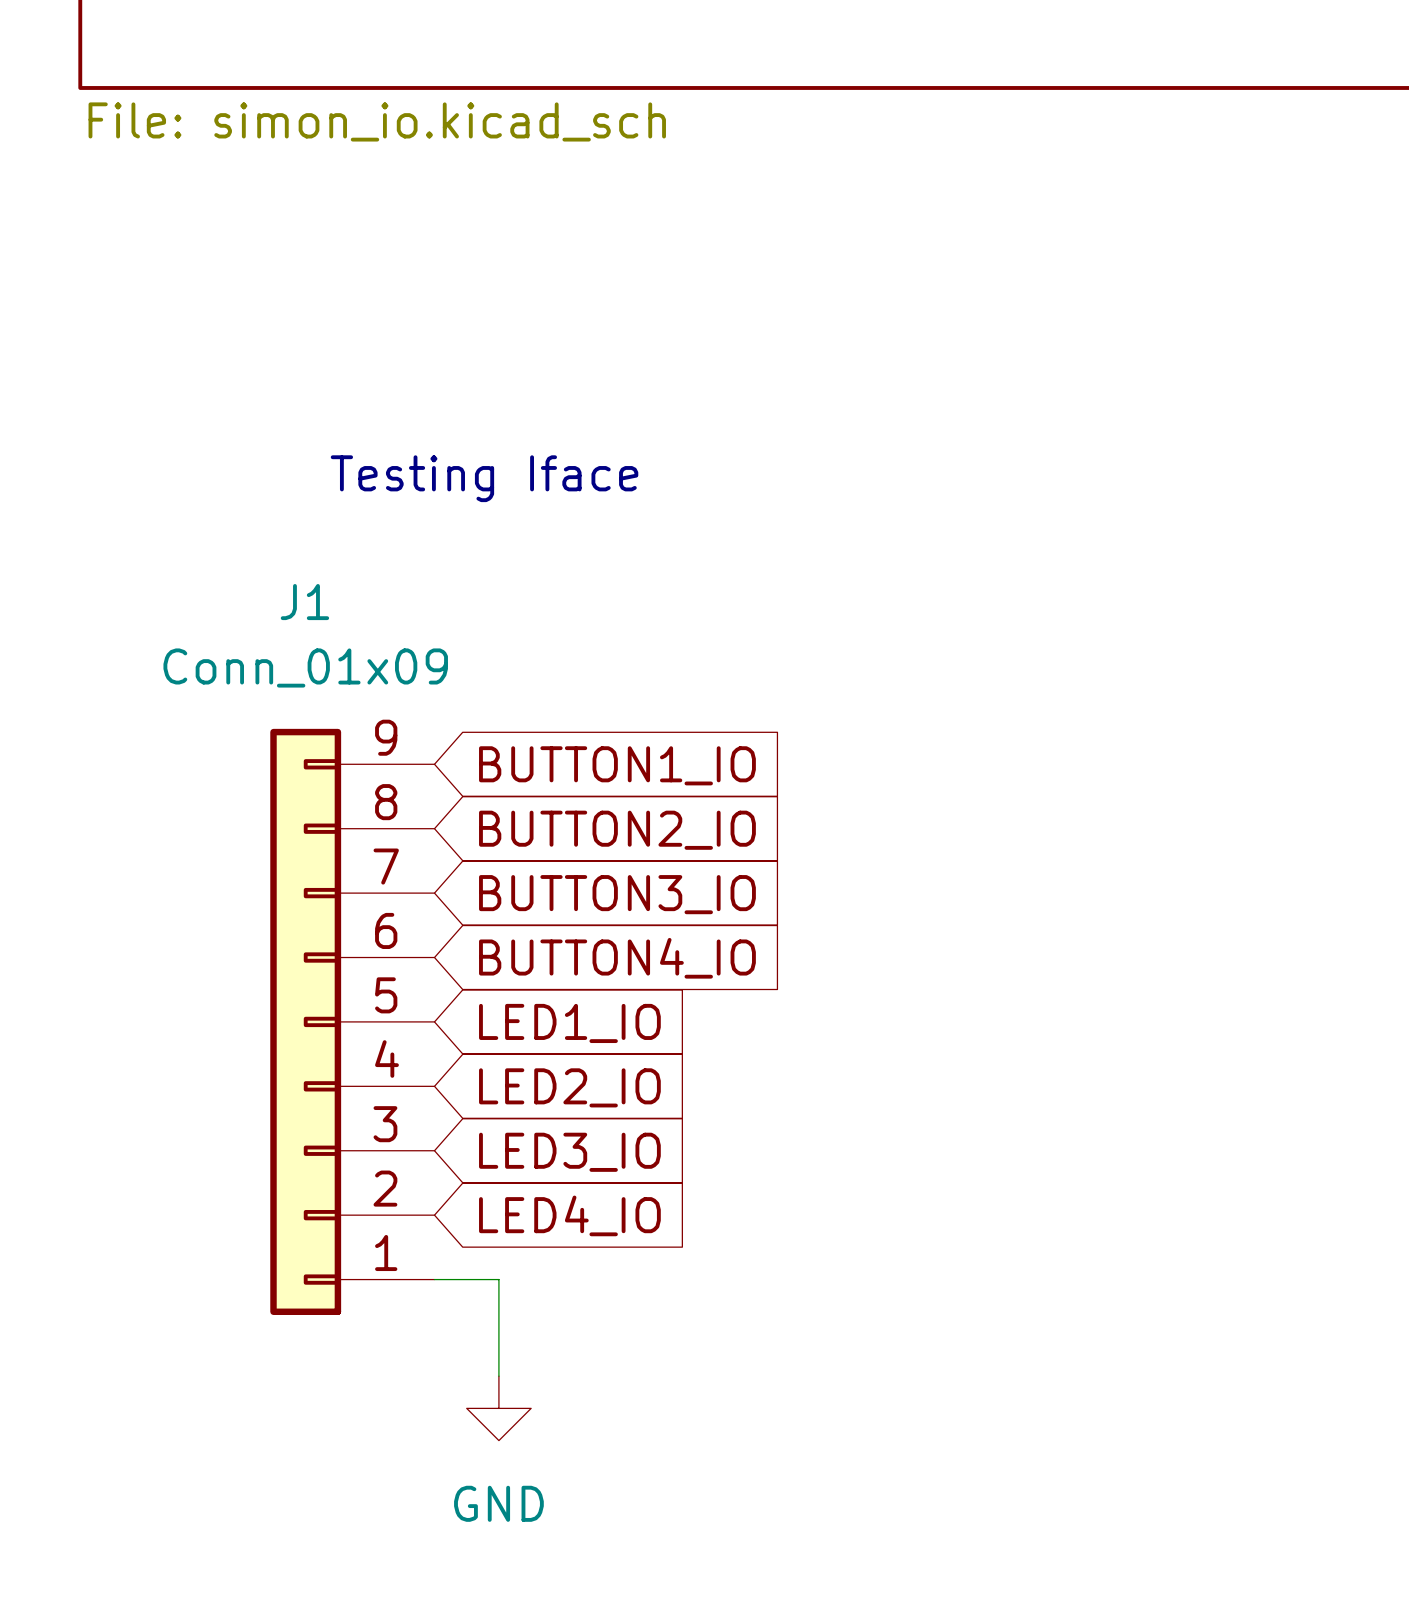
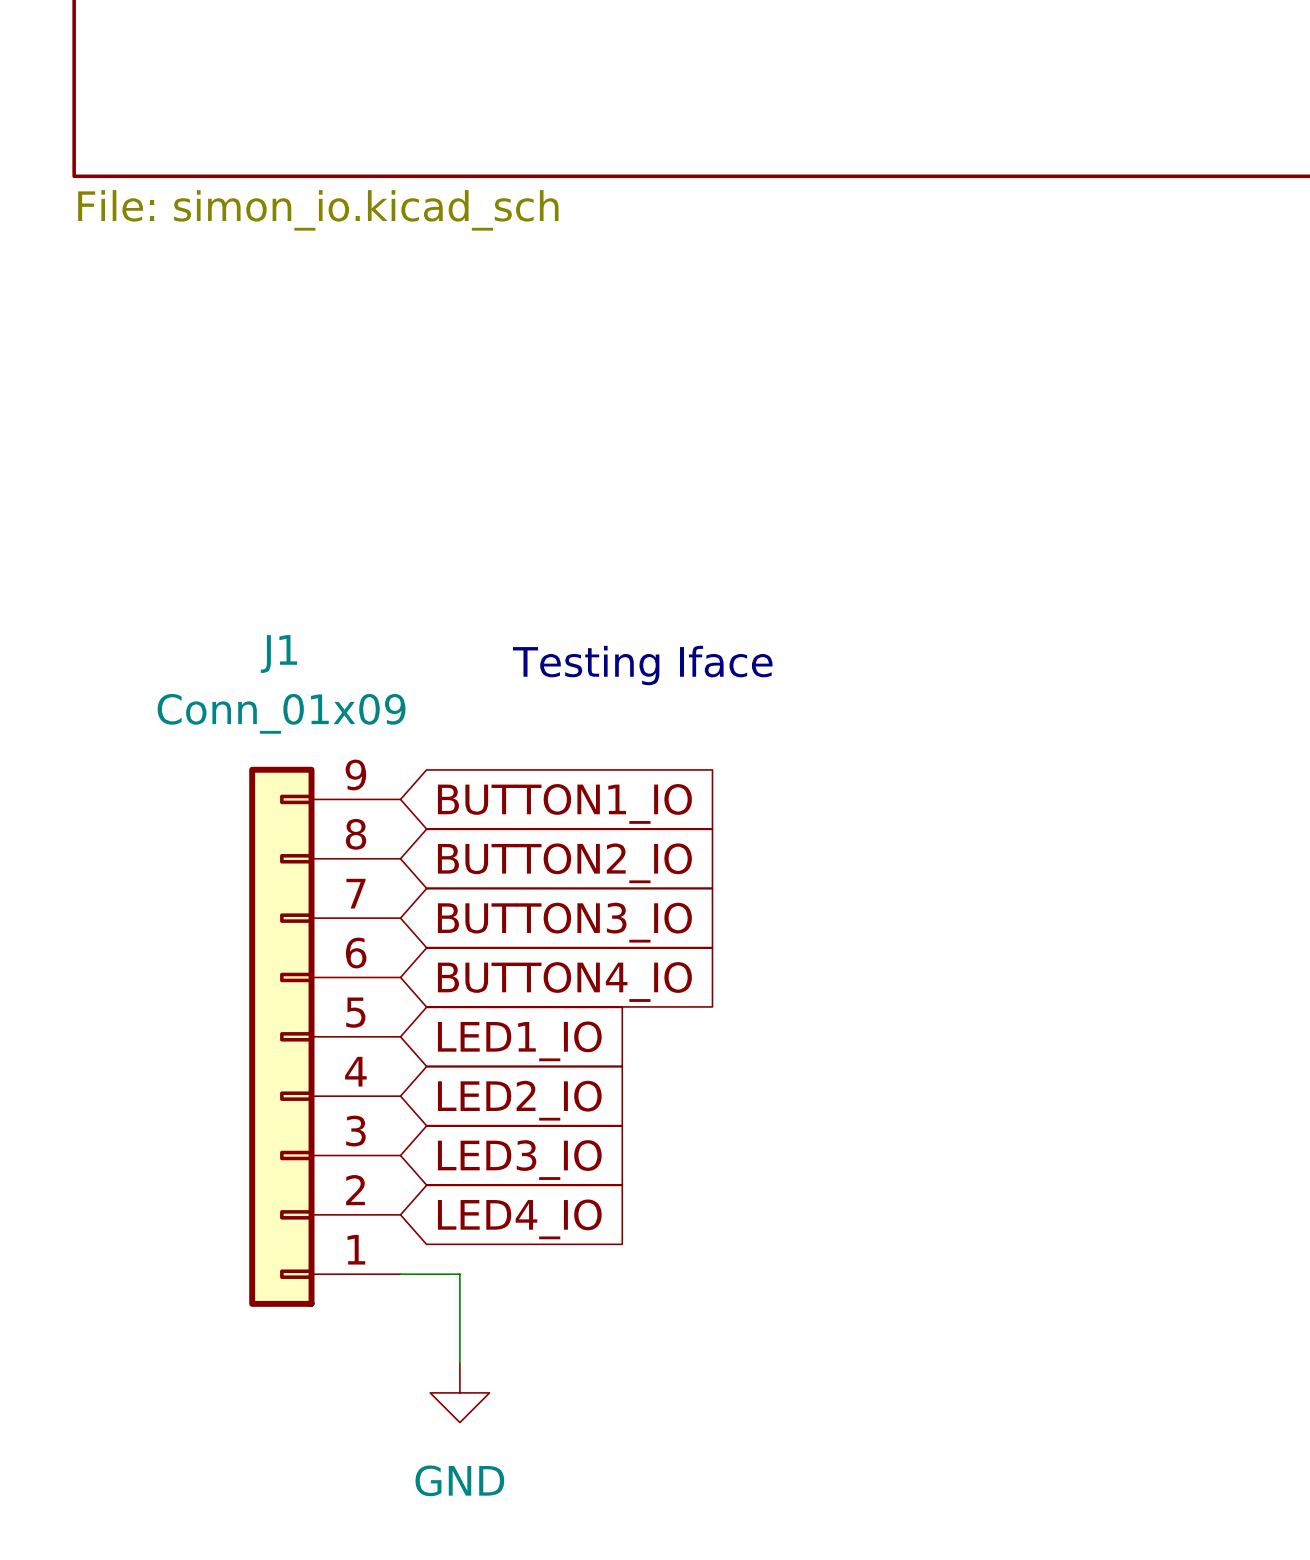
text position: Testing Iface (484, 478) -> Testing Iface (642, 665)

